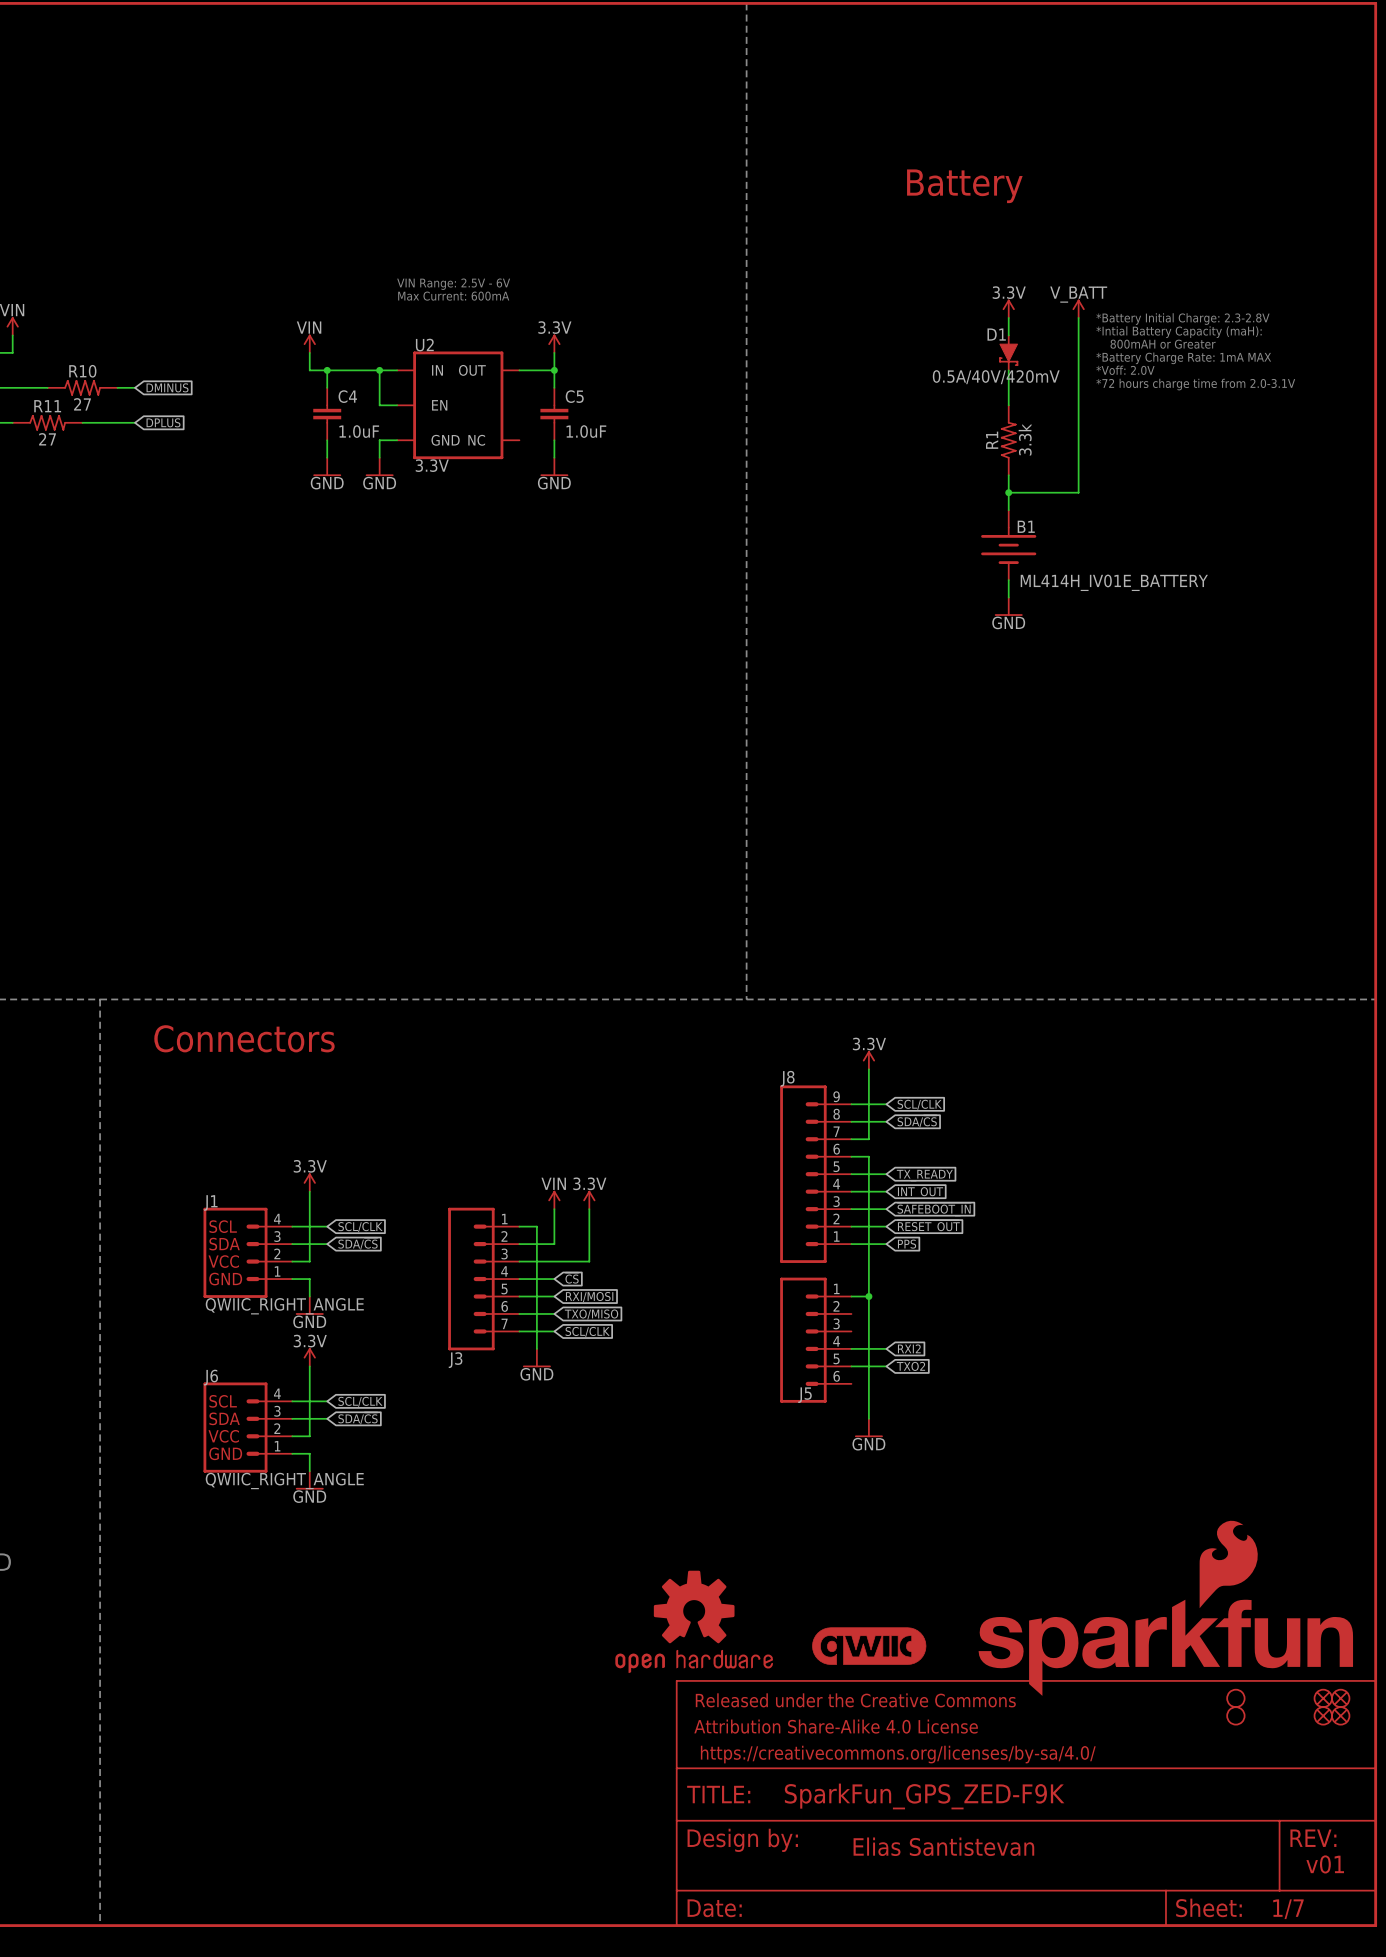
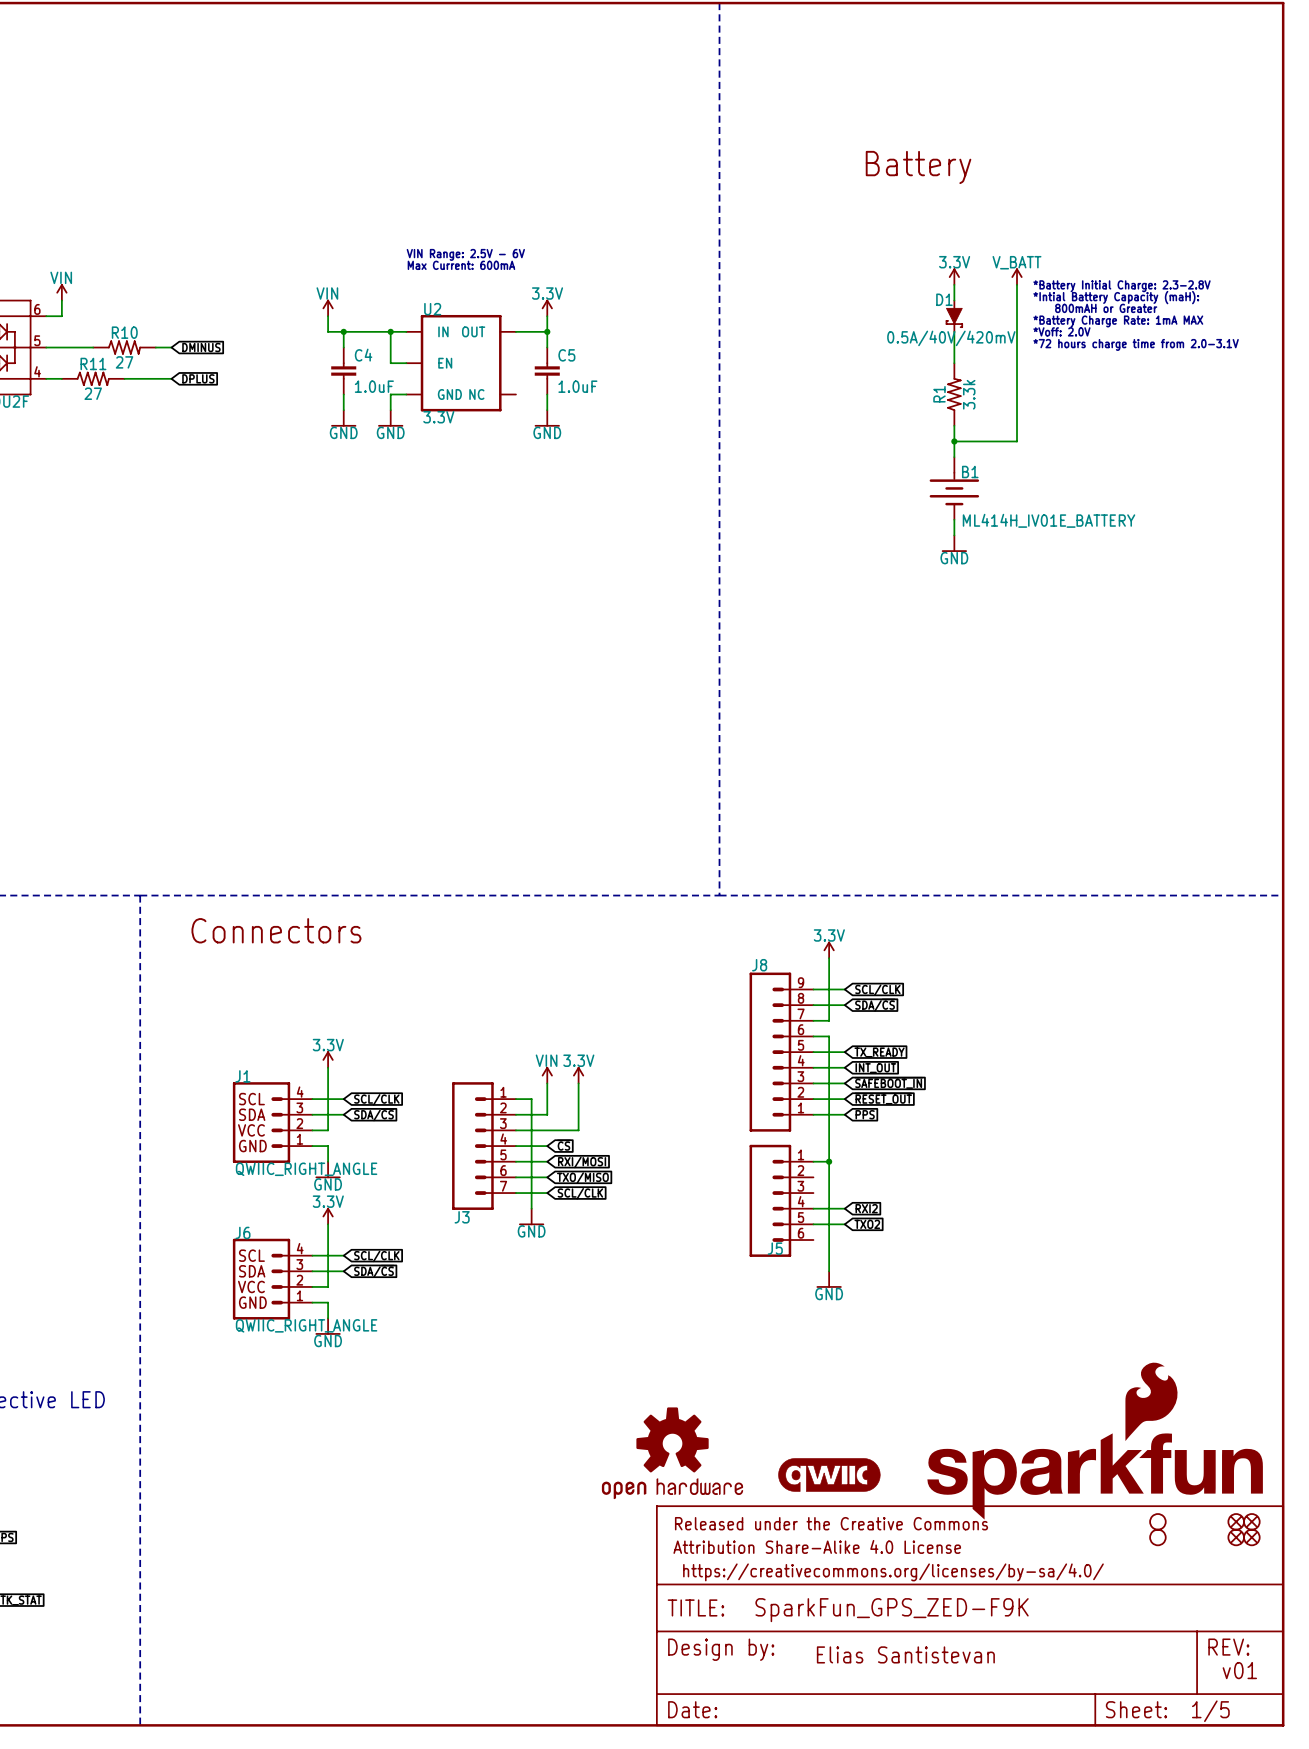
part text: 1/7 (1288, 1909) -> 1/5 (1210, 1711)

